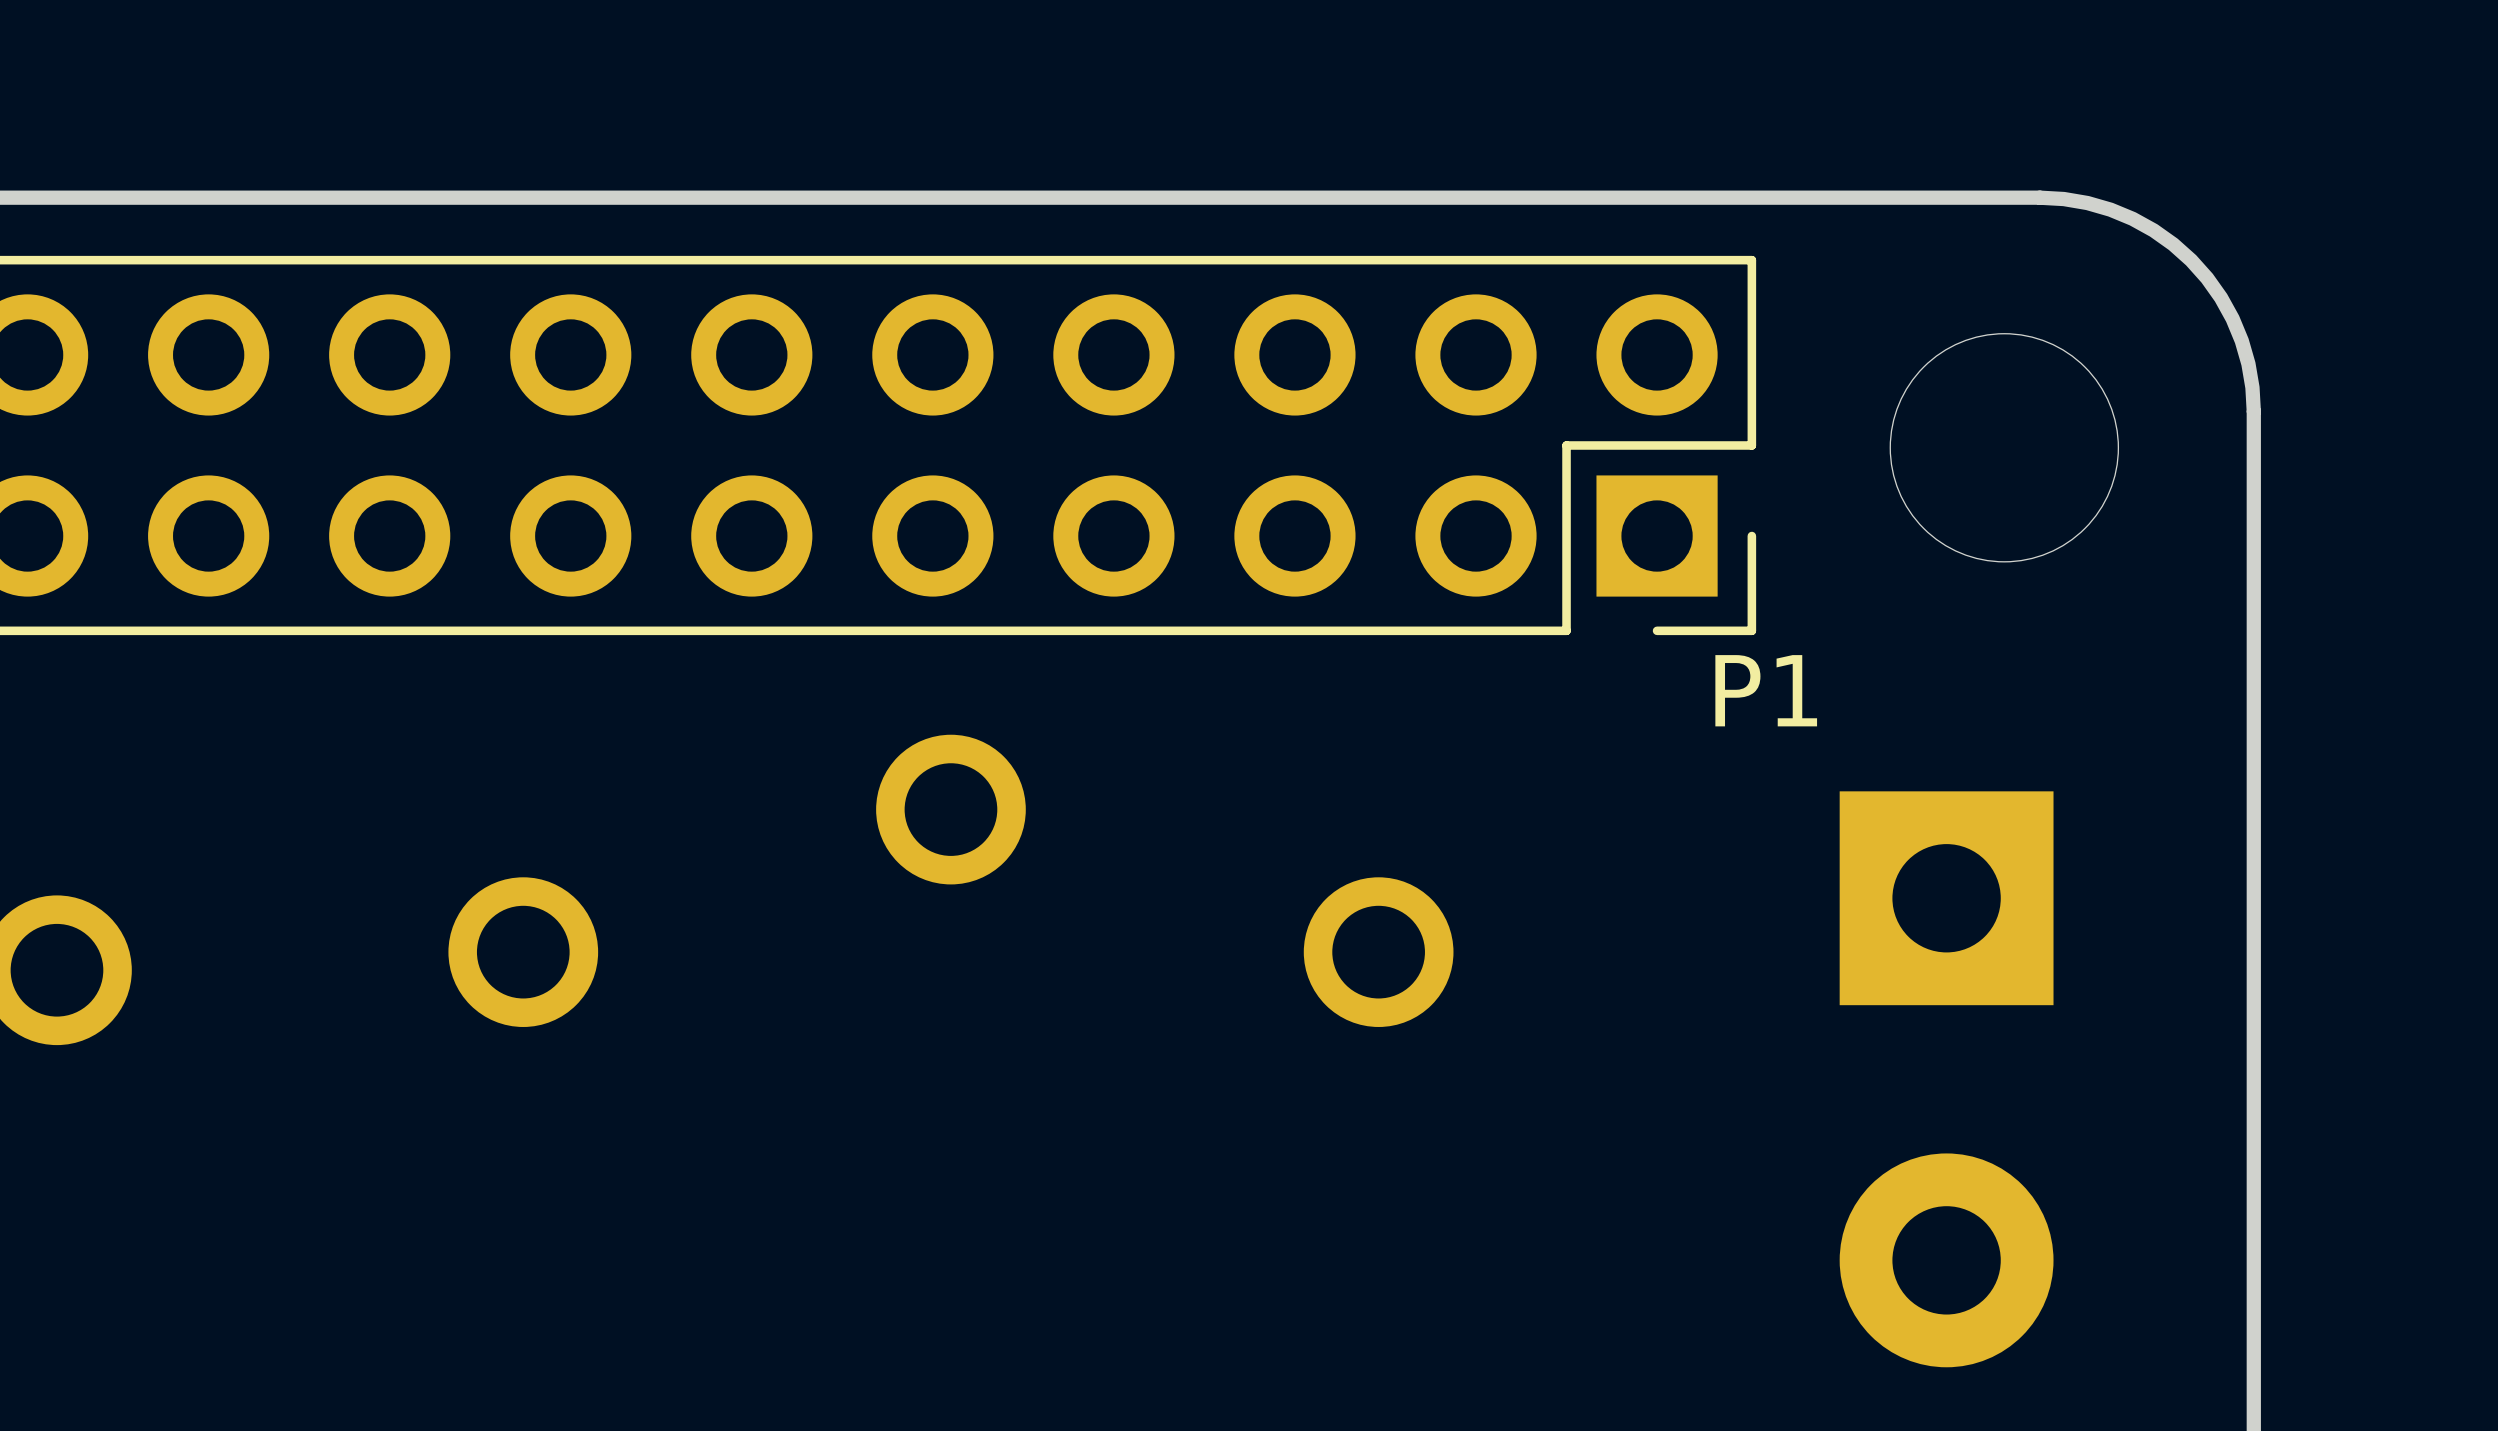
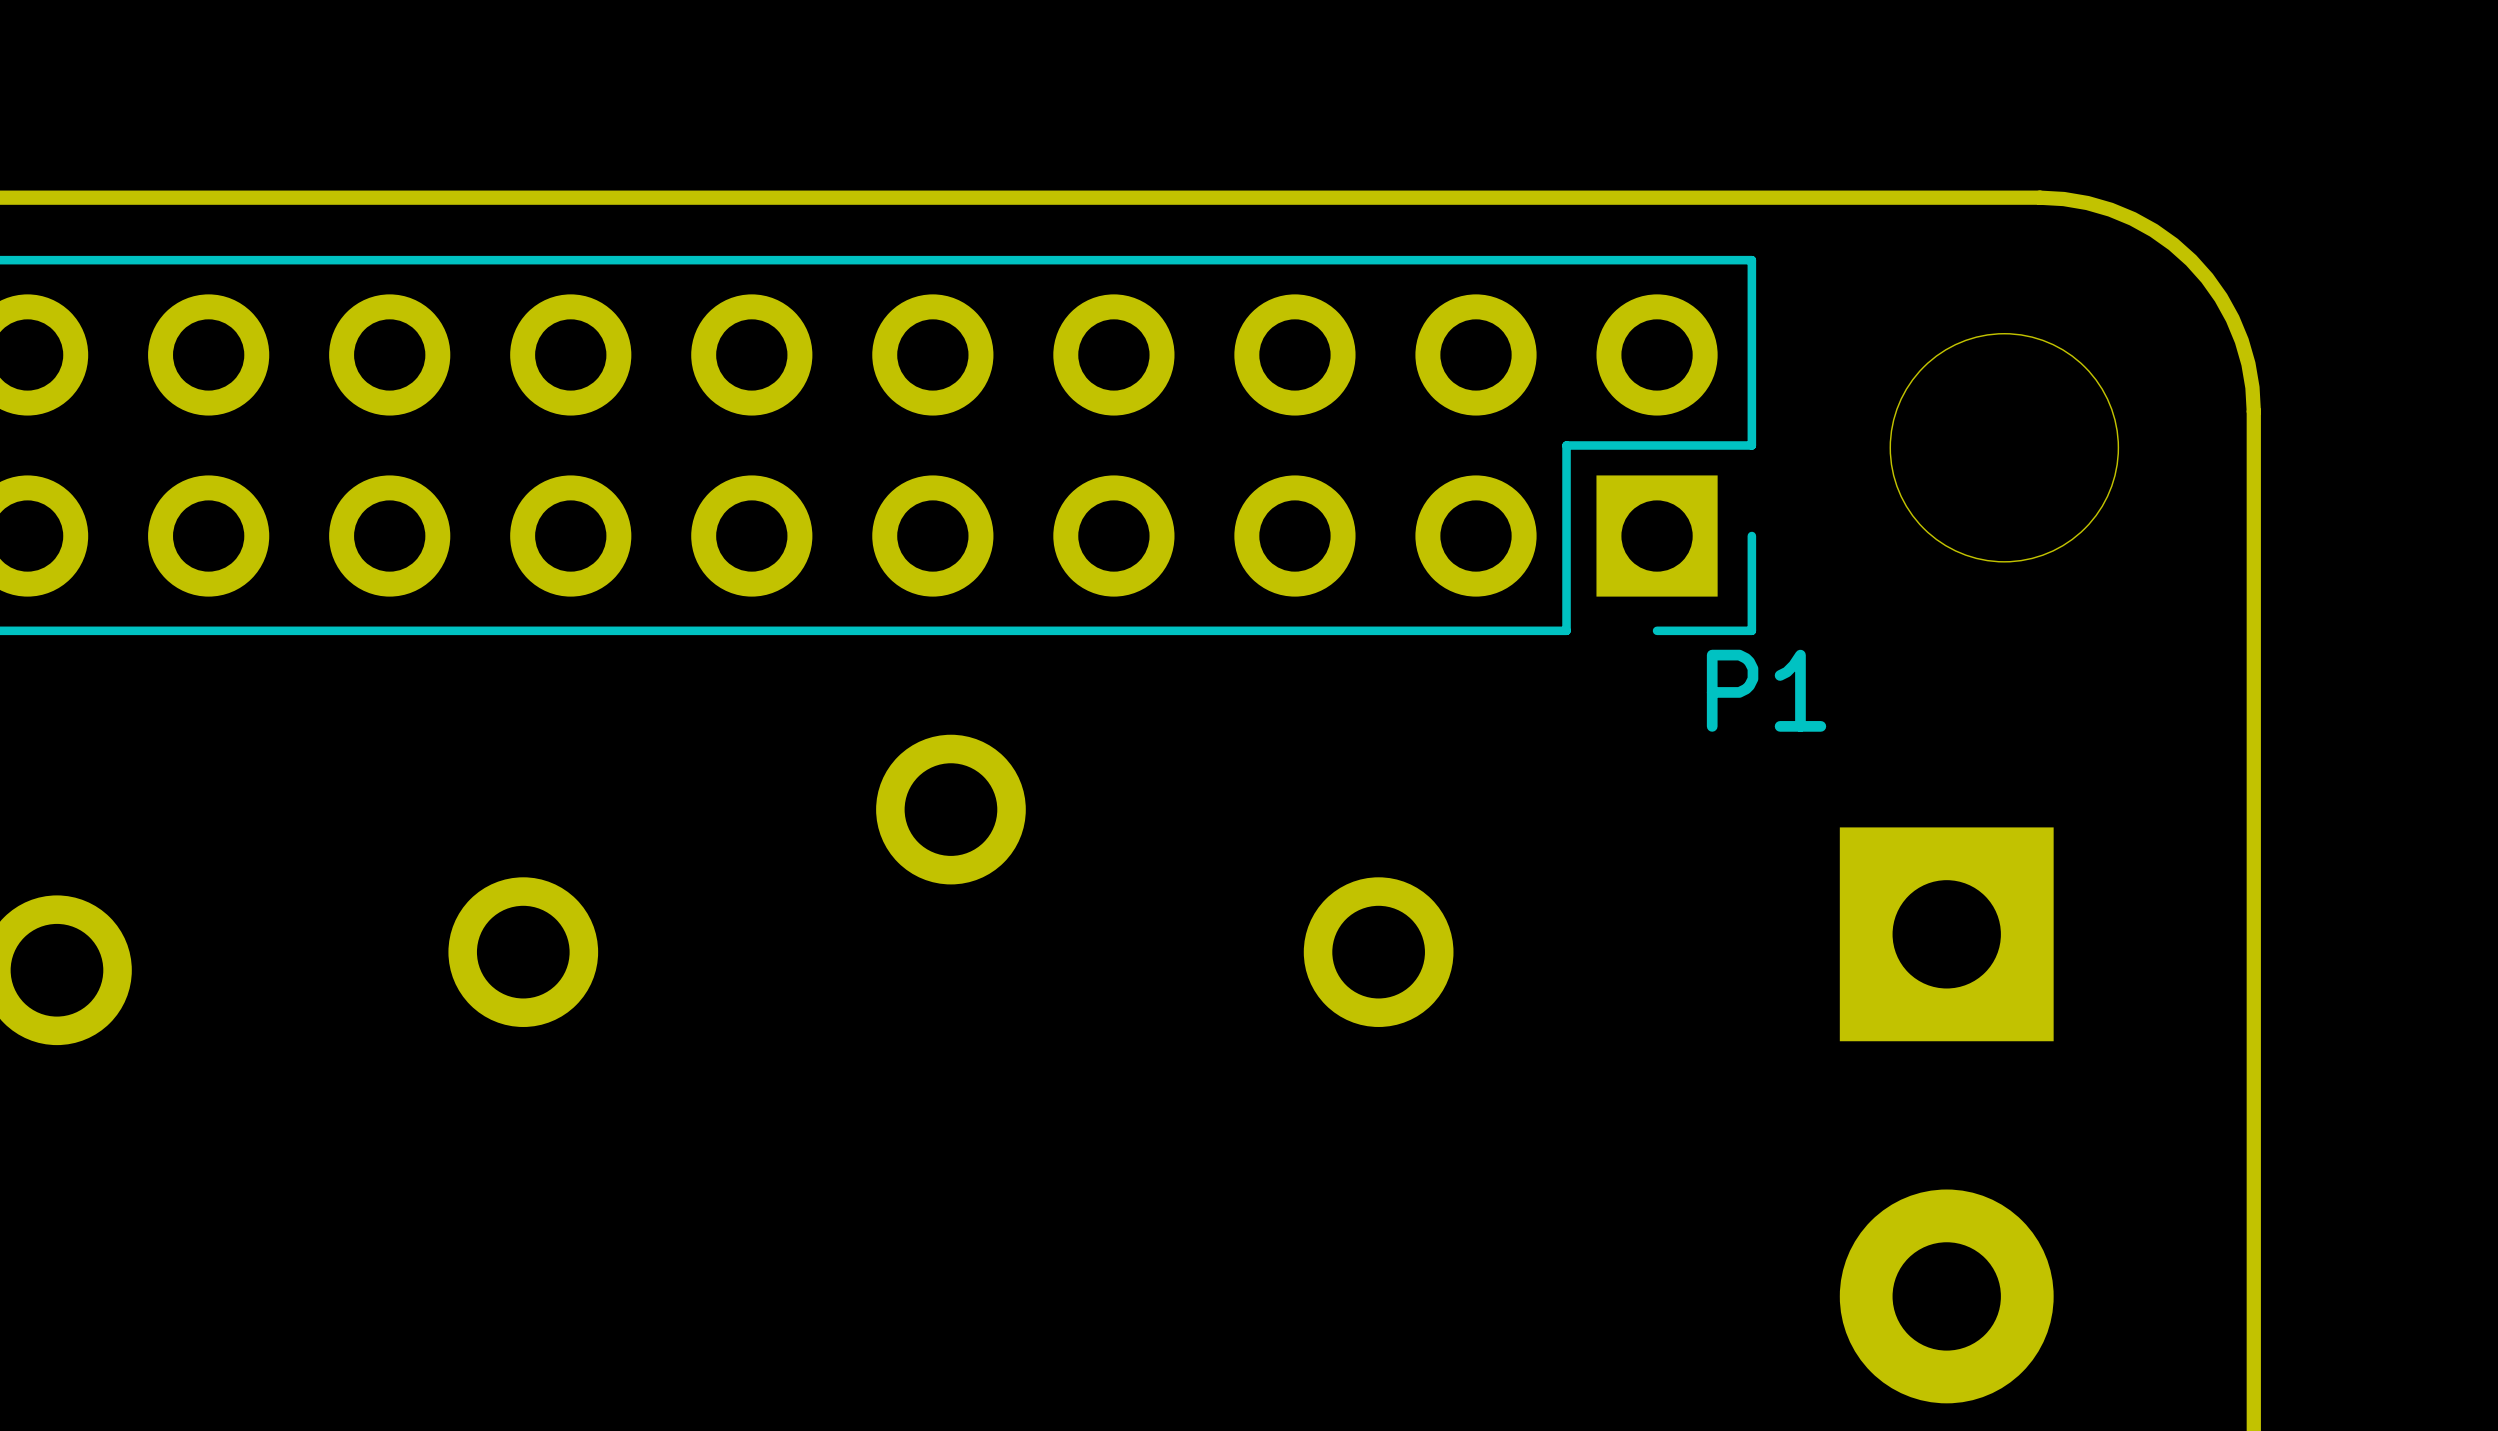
part position: (1946, 1079) -> (1946, 1115)

